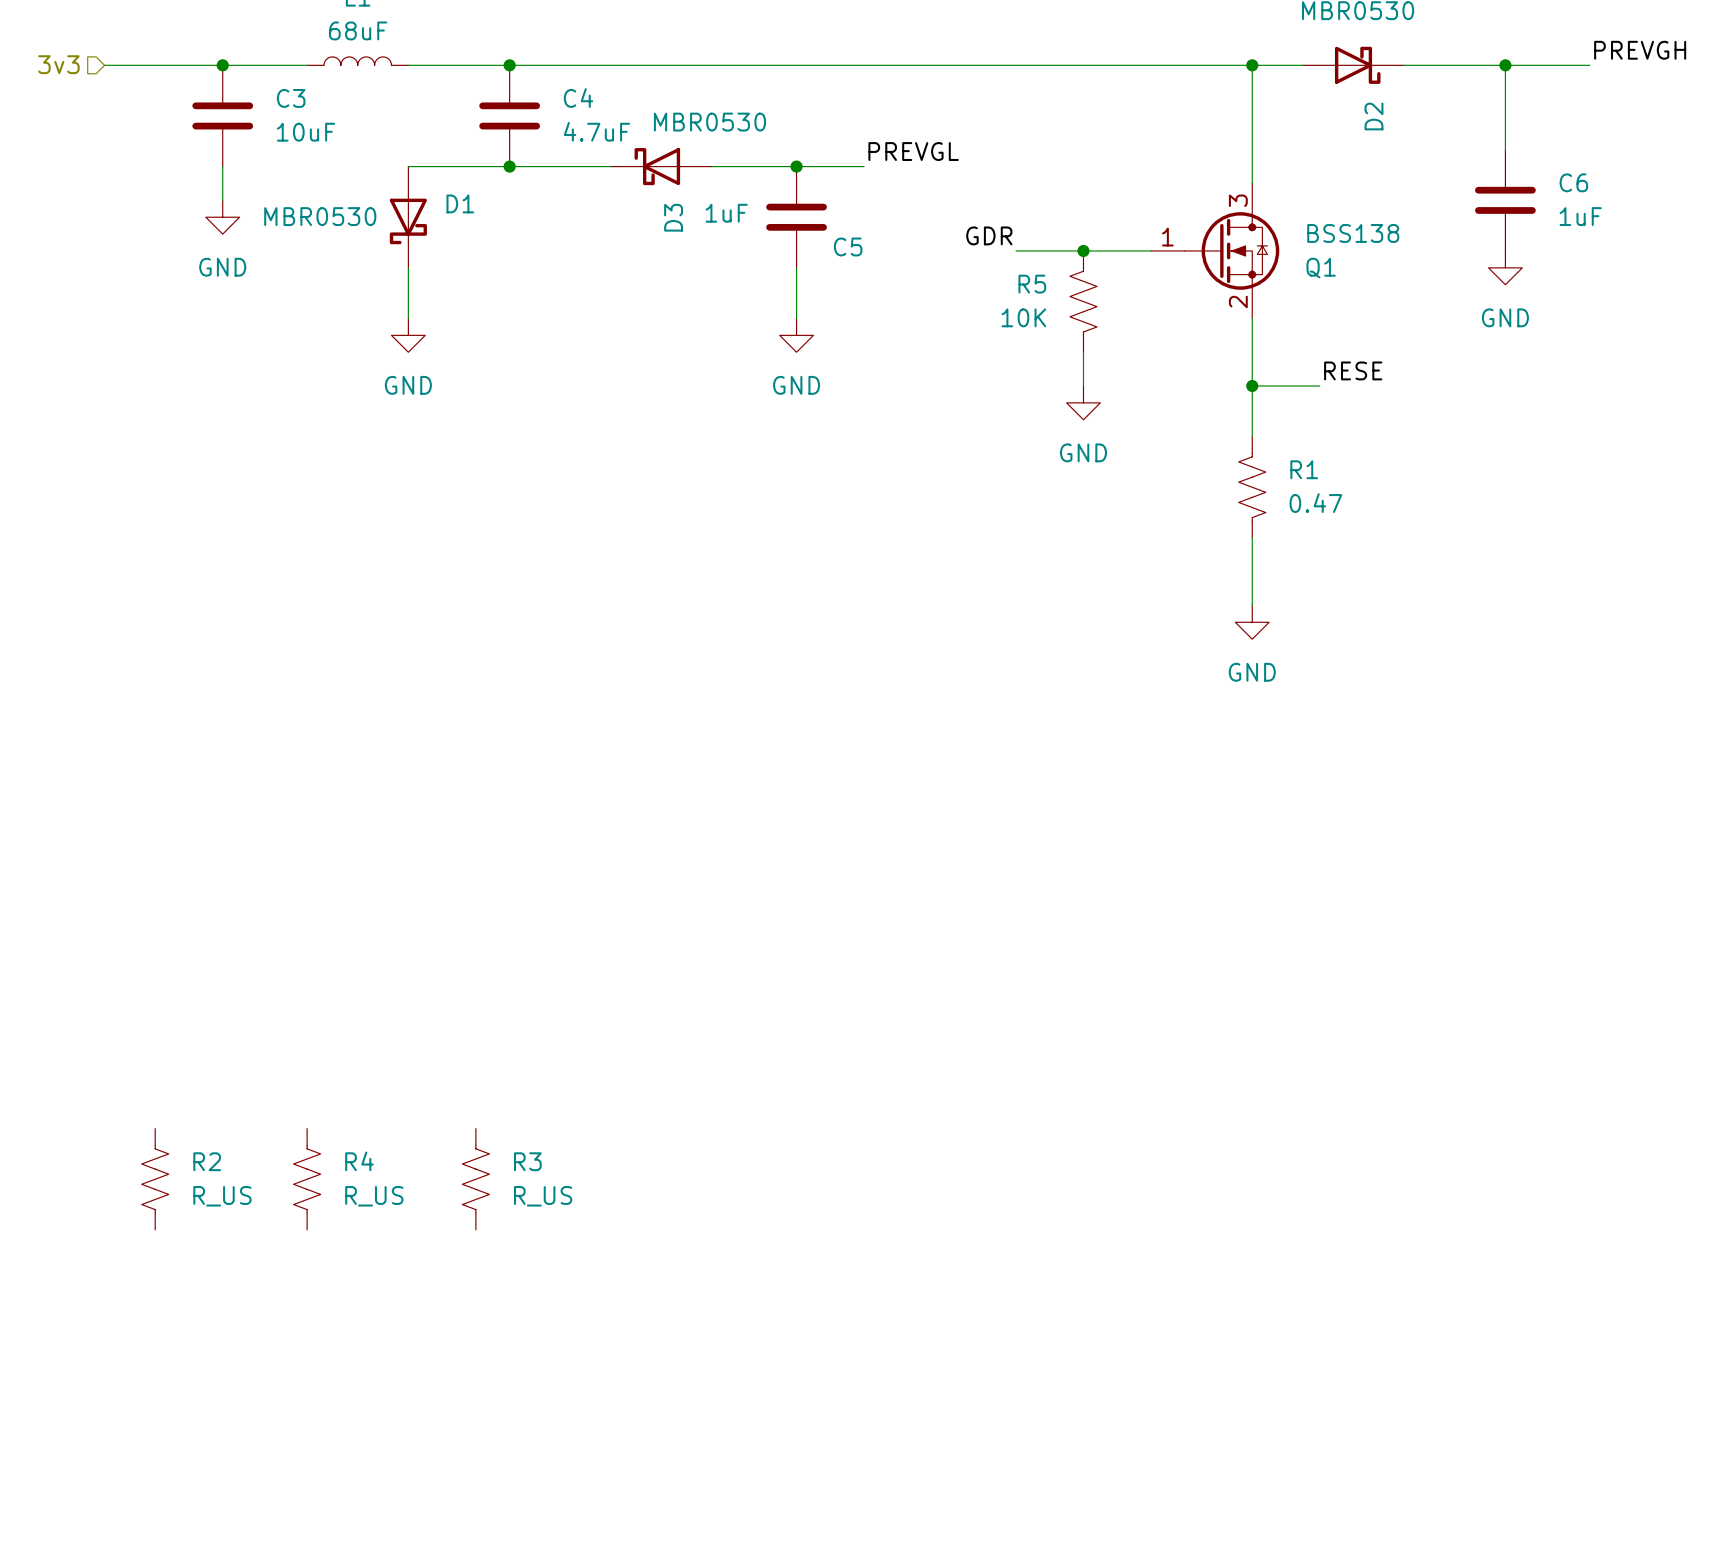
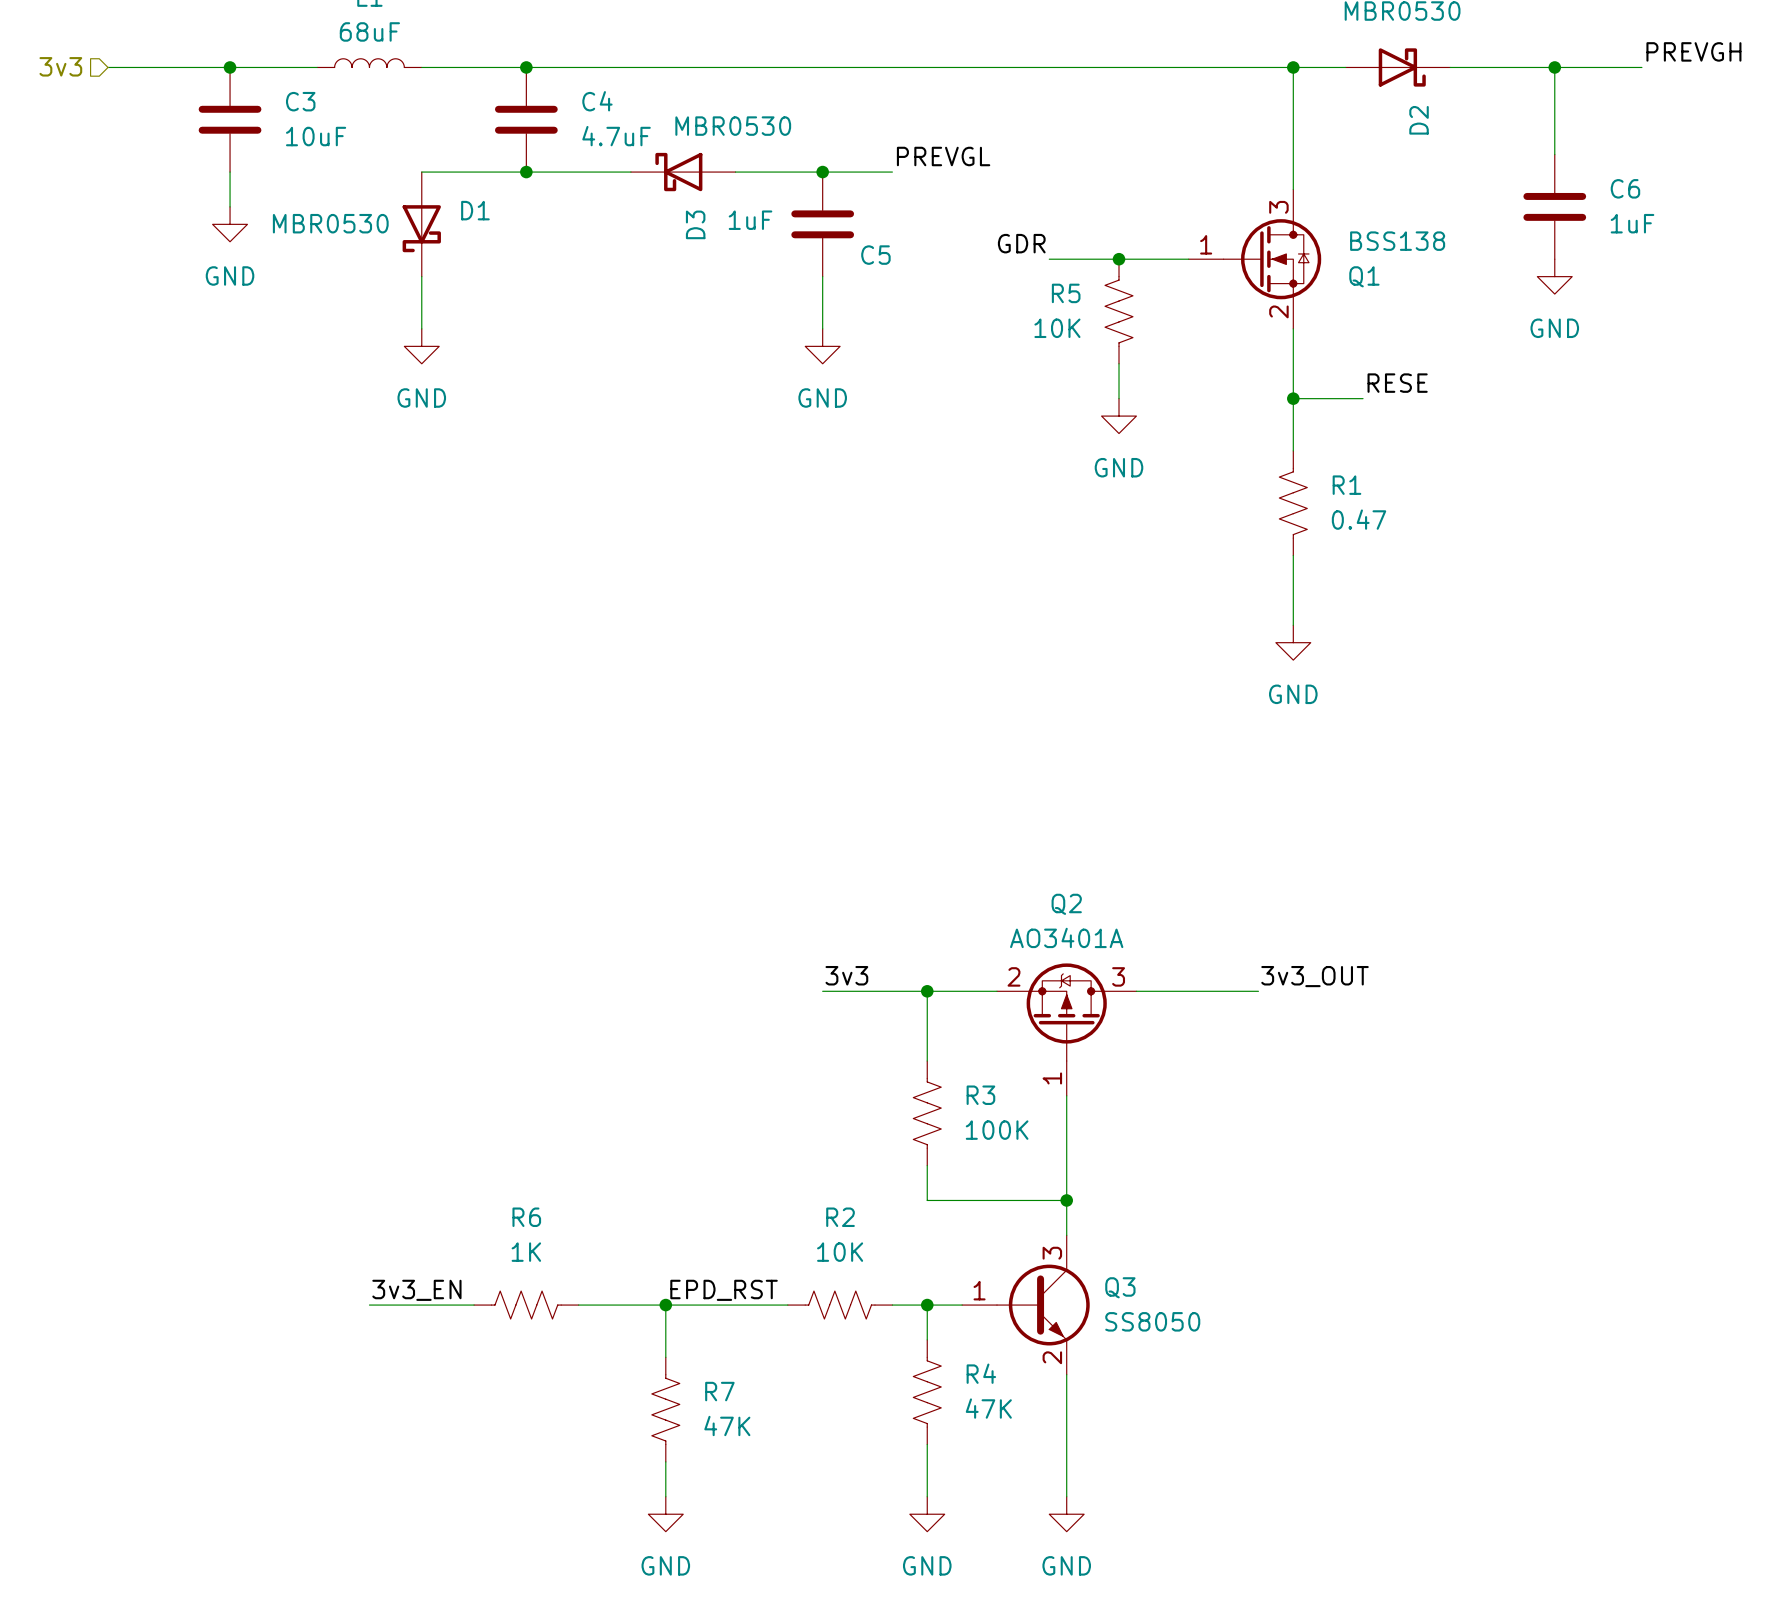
label: none -> 3v3 (846, 975)
label: none -> 3v3_OUT (1315, 976)
wire: none -> (822, 991) (996, 991)
wire: none -> (927, 991) (927, 1061)
junction: none -> (927, 991)
wire: none -> (1136, 991) (1258, 991)
Q2: none -> AO3401A (1066, 1029)
wire: none -> (1066, 1095) (1066, 1235)
wire: none -> (927, 1165) (927, 1200) (1066, 1200)
R2 name position: R2 (207, 1161) -> R2 (840, 1217)
junction: none -> (1066, 1200)
R2 rotation: 0° (155, 1179) -> 90° clockwise (840, 1305)
R2 position: (155, 1179) -> (840, 1305)
R4 position: (307, 1179) -> (927, 1392)
R3 position: (475, 1179) -> (927, 1113)
R2 value: R_US (222, 1196) -> 10K (840, 1252)
R4 value: R_US (374, 1196) -> 47K (988, 1408)
R3 value: R_US (543, 1196) -> 100K (997, 1130)
label: none -> 3v3_EN (416, 1290)
label: none -> EPD_RST (724, 1290)
wire: none -> (369, 1305) (474, 1305)
R6: none -> 1K (526, 1305)
wire: none -> (578, 1305) (787, 1305)
wire: none -> (665, 1305) (665, 1357)
junction: none -> (665, 1305)
wire: none -> (892, 1305) (962, 1305)
wire: none -> (927, 1305) (927, 1339)
junction: none -> (927, 1305)
Q3: none -> SS8050 (1025, 1305)
wire: none -> (1066, 1374) (1066, 1496)
R7: none -> 47K (665, 1409)
wire: none -> (927, 1444) (927, 1496)
wire: none -> (665, 1461) (665, 1496)
power symbol: none -> GND (665, 1514)
power symbol: none -> GND (927, 1514)
power symbol: none -> GND (1066, 1514)

